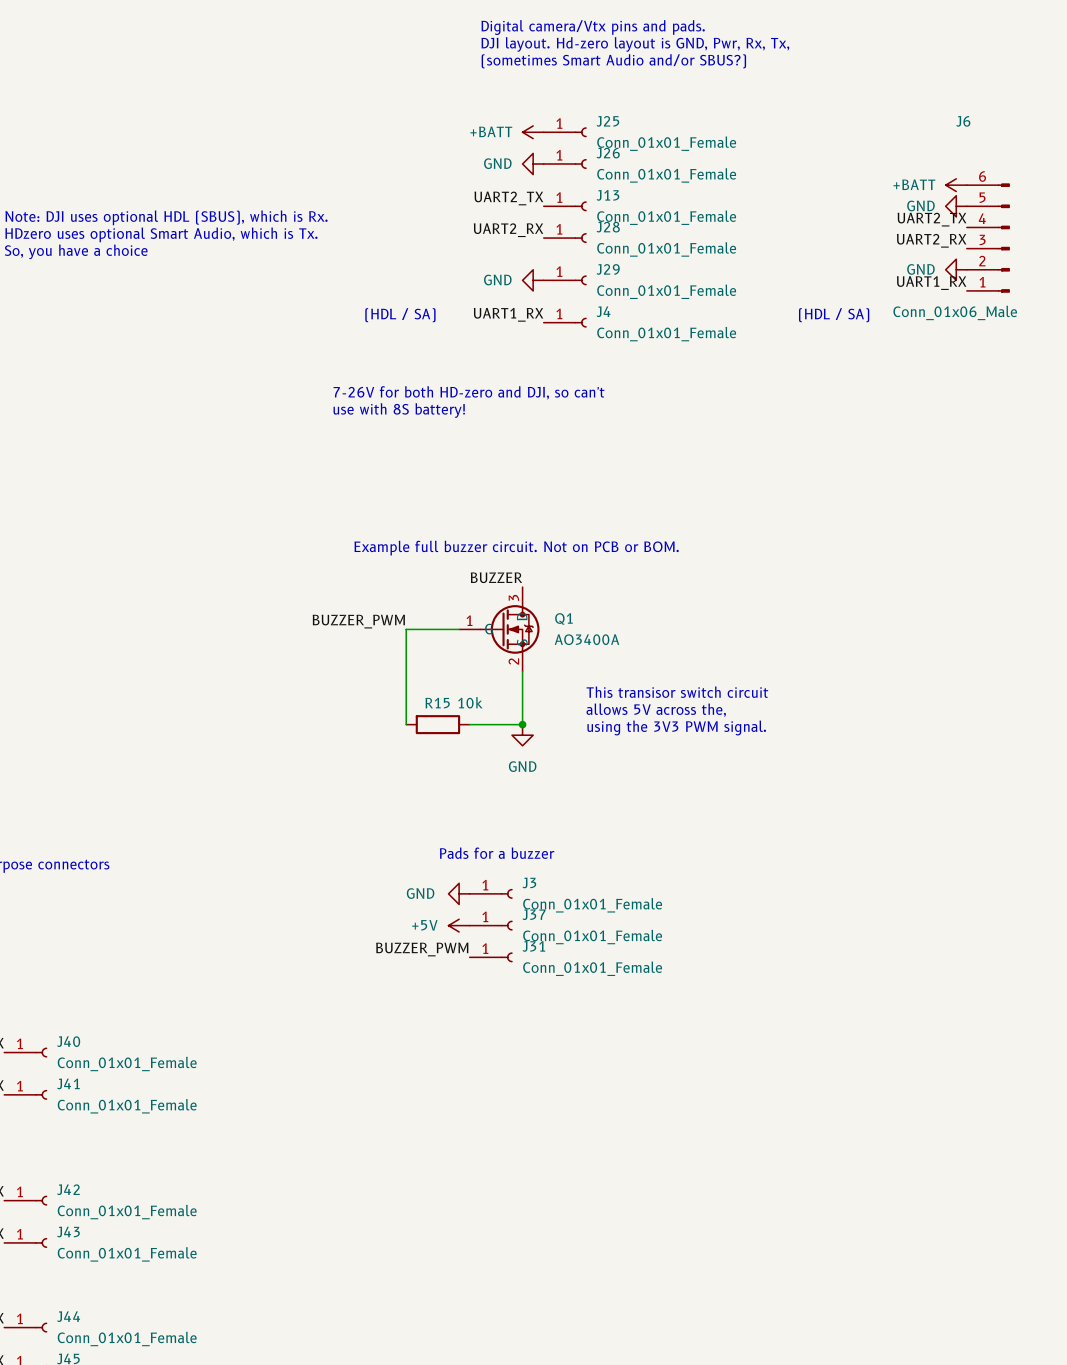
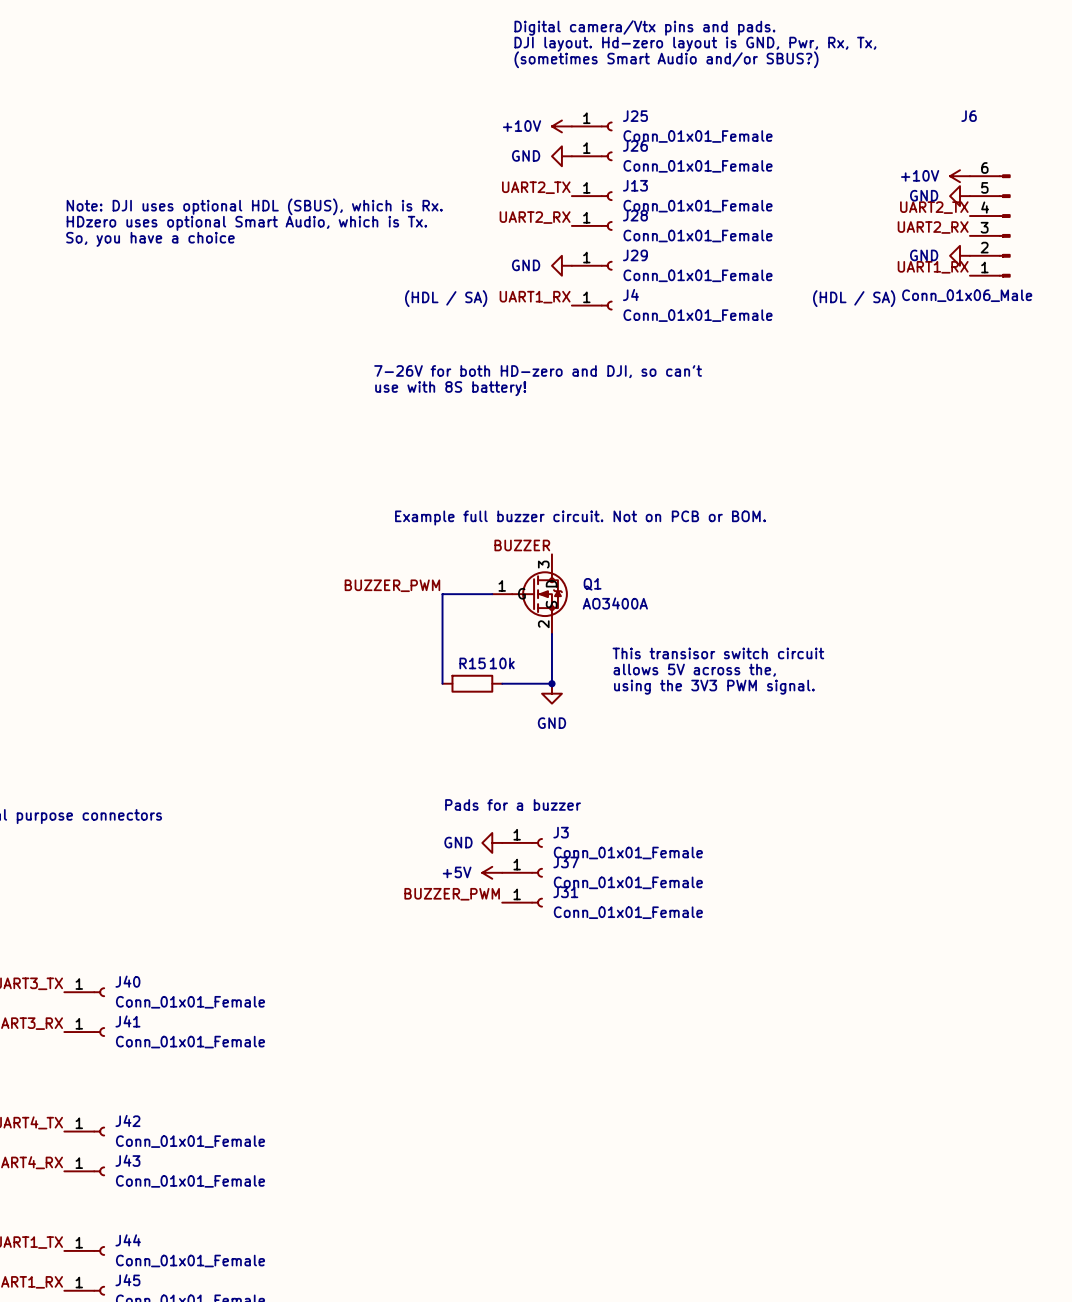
power symbol: +BATT (533, 132) -> +10V (561, 126)
power symbol: +BATT (956, 185) -> +10V (959, 176)

